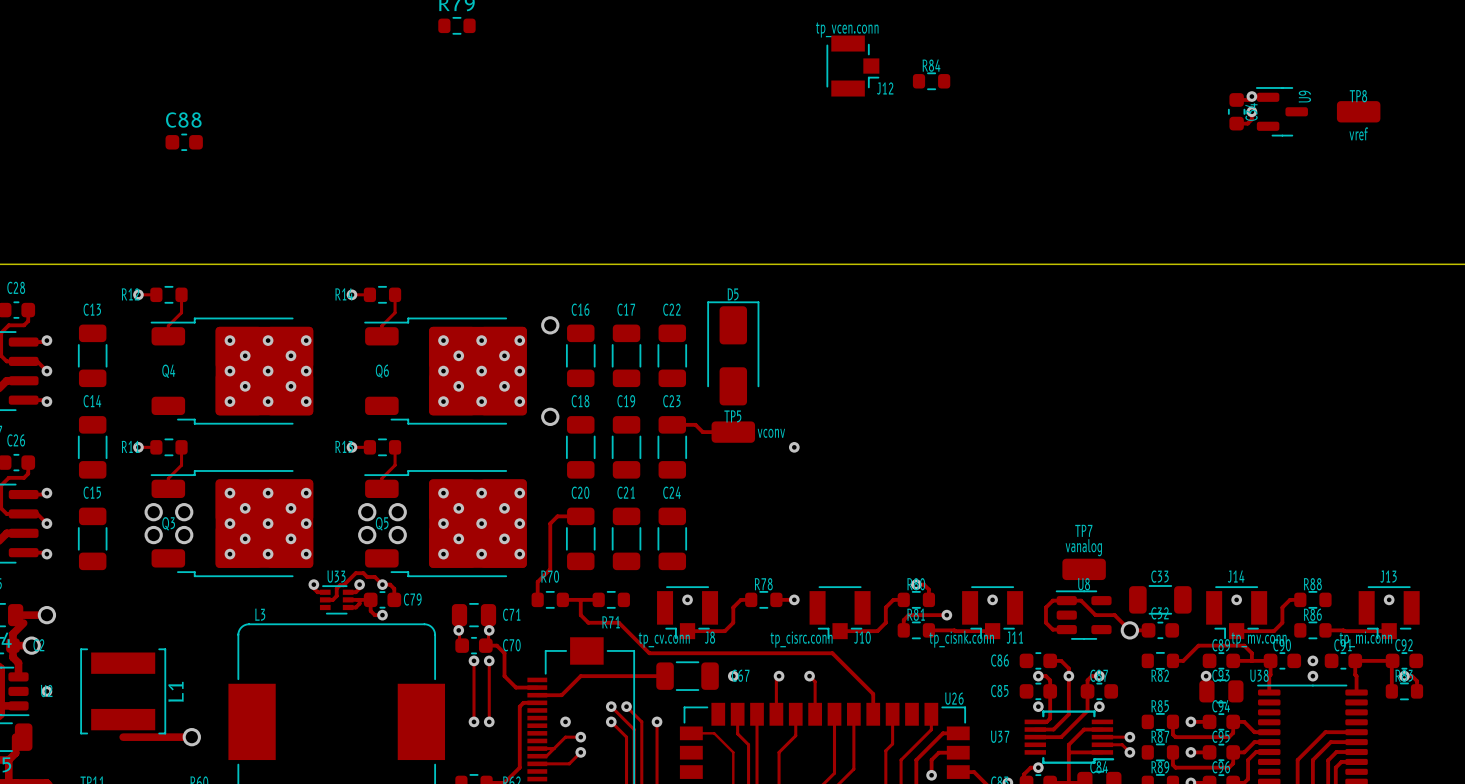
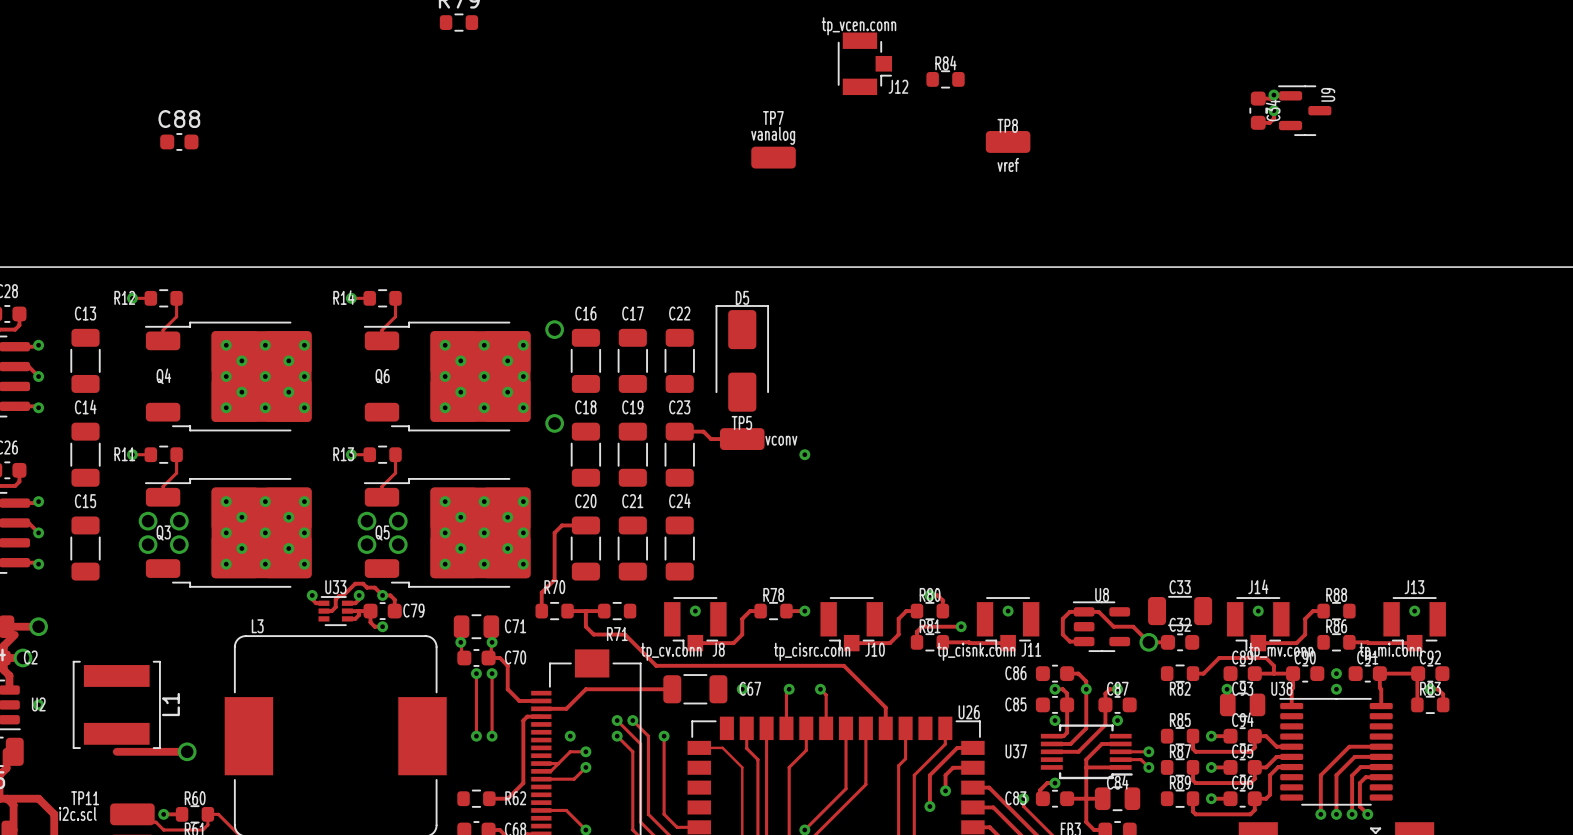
TP8 position: (1358, 111) -> (1008, 141)
TP7 position: (1084, 569) -> (773, 157)

